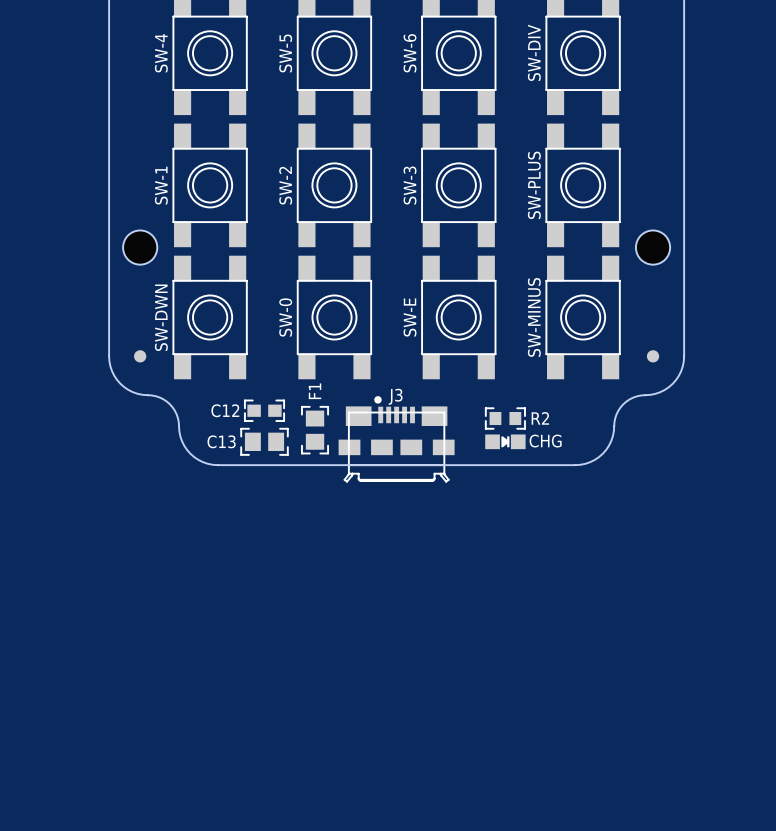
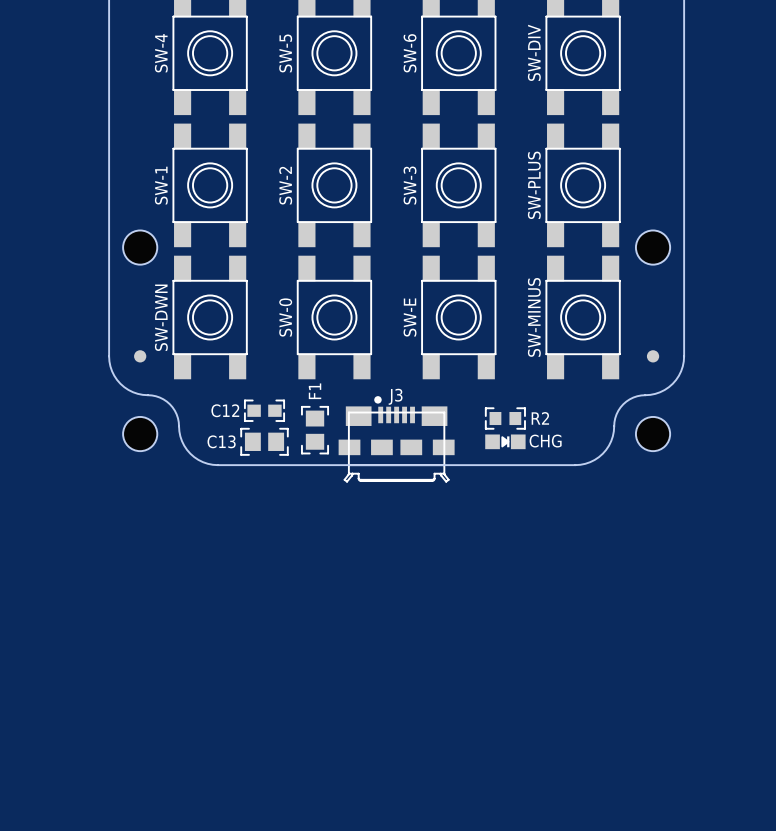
part: none -> (140, 434)
part: none -> (653, 434)

